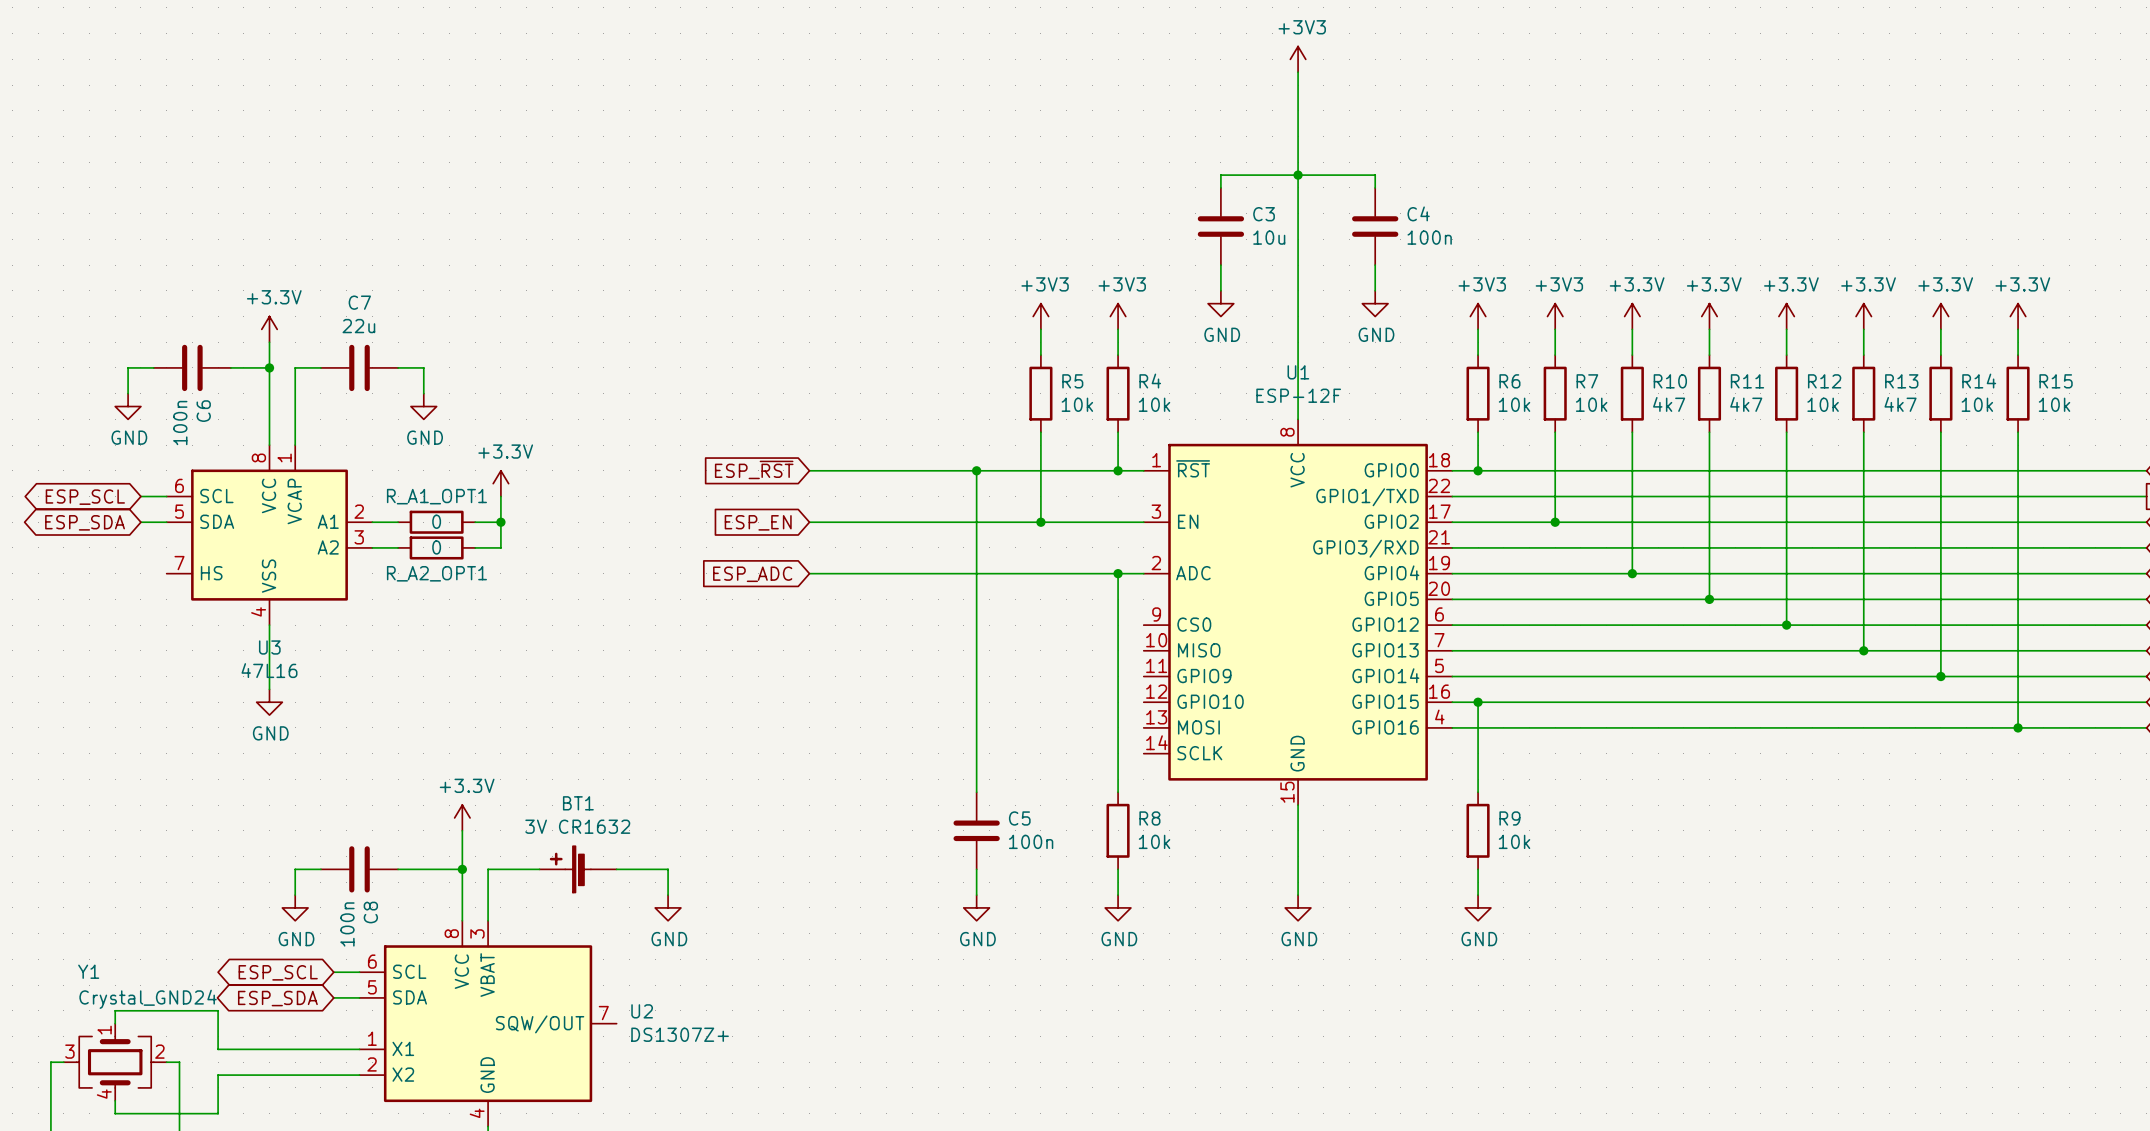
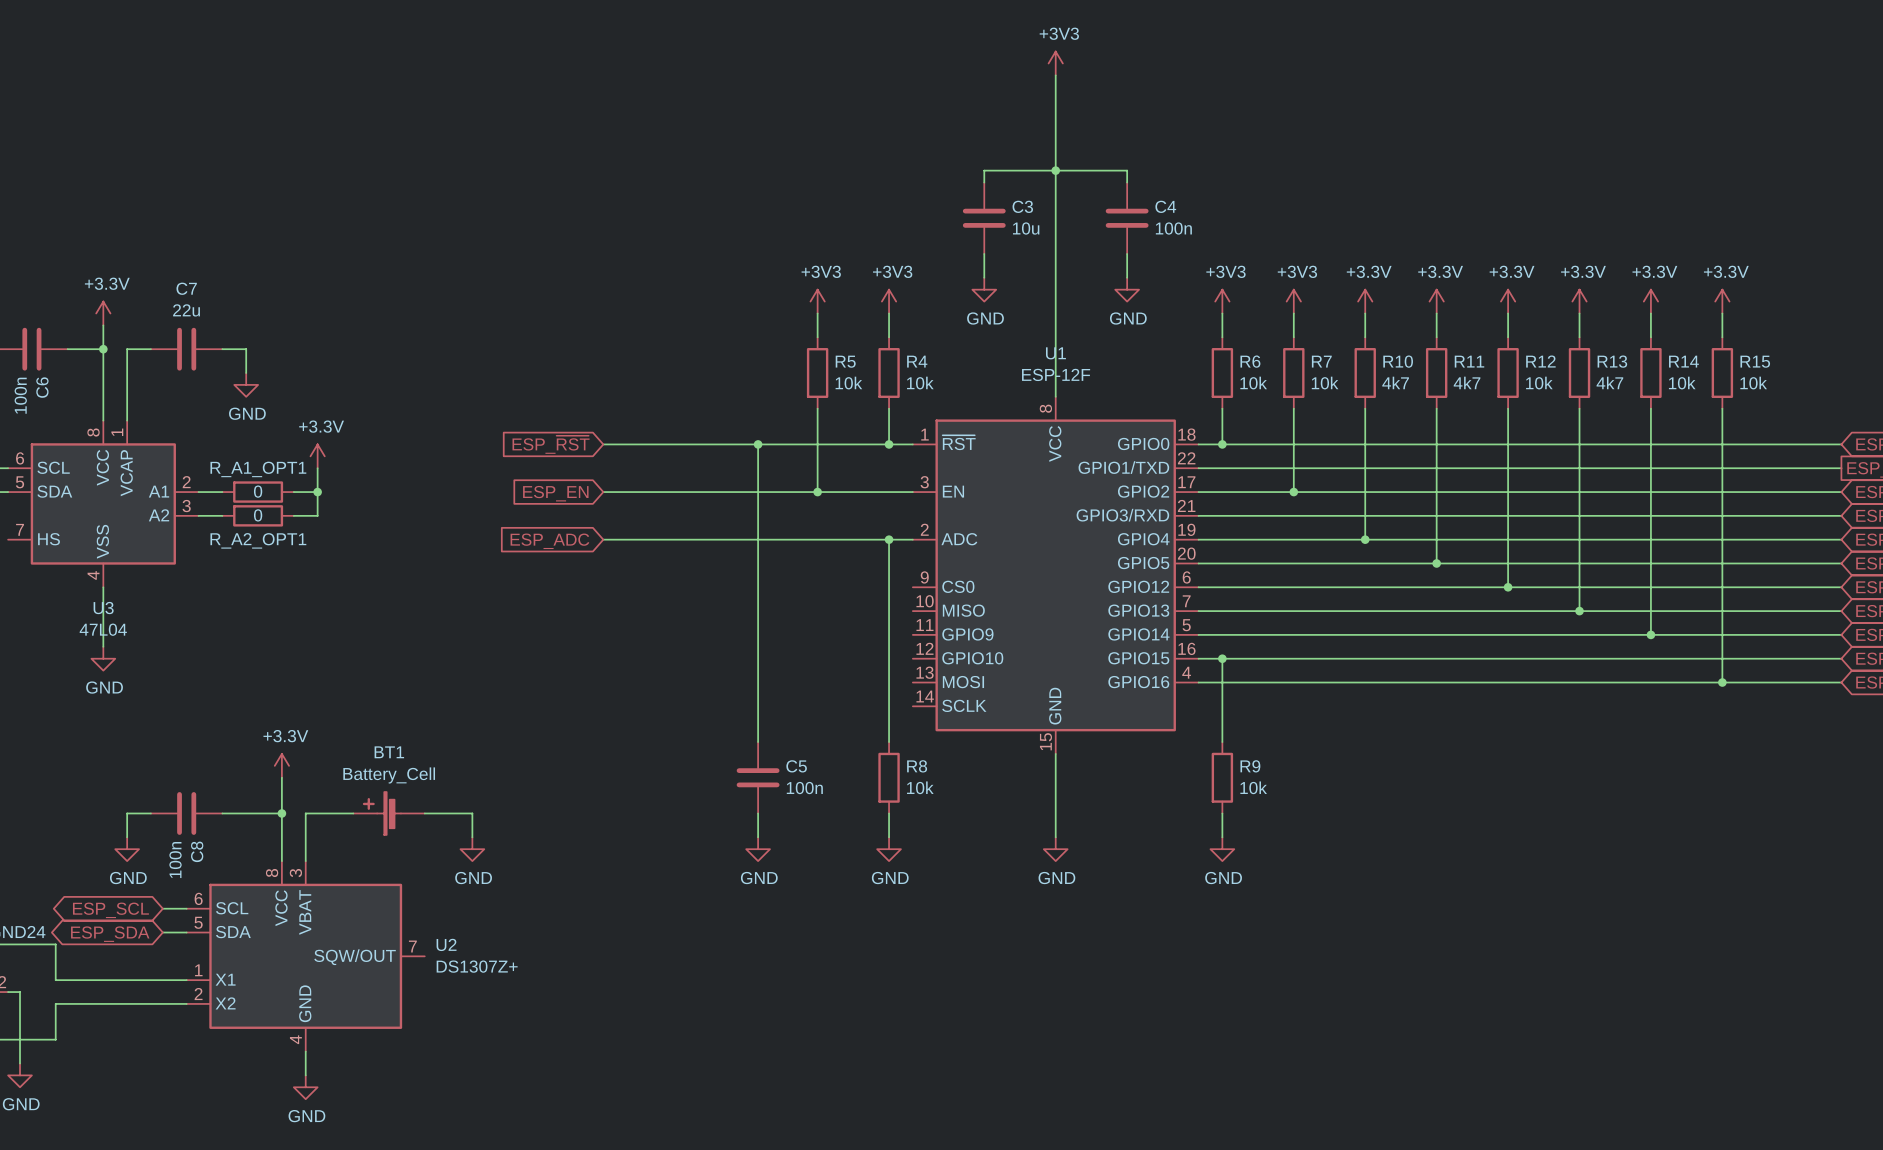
U3 value: 47L16 (269, 670) -> 47L04 (103, 629)
BT1 value: 3V CR1632 (577, 826) -> Battery_Cell (389, 775)

